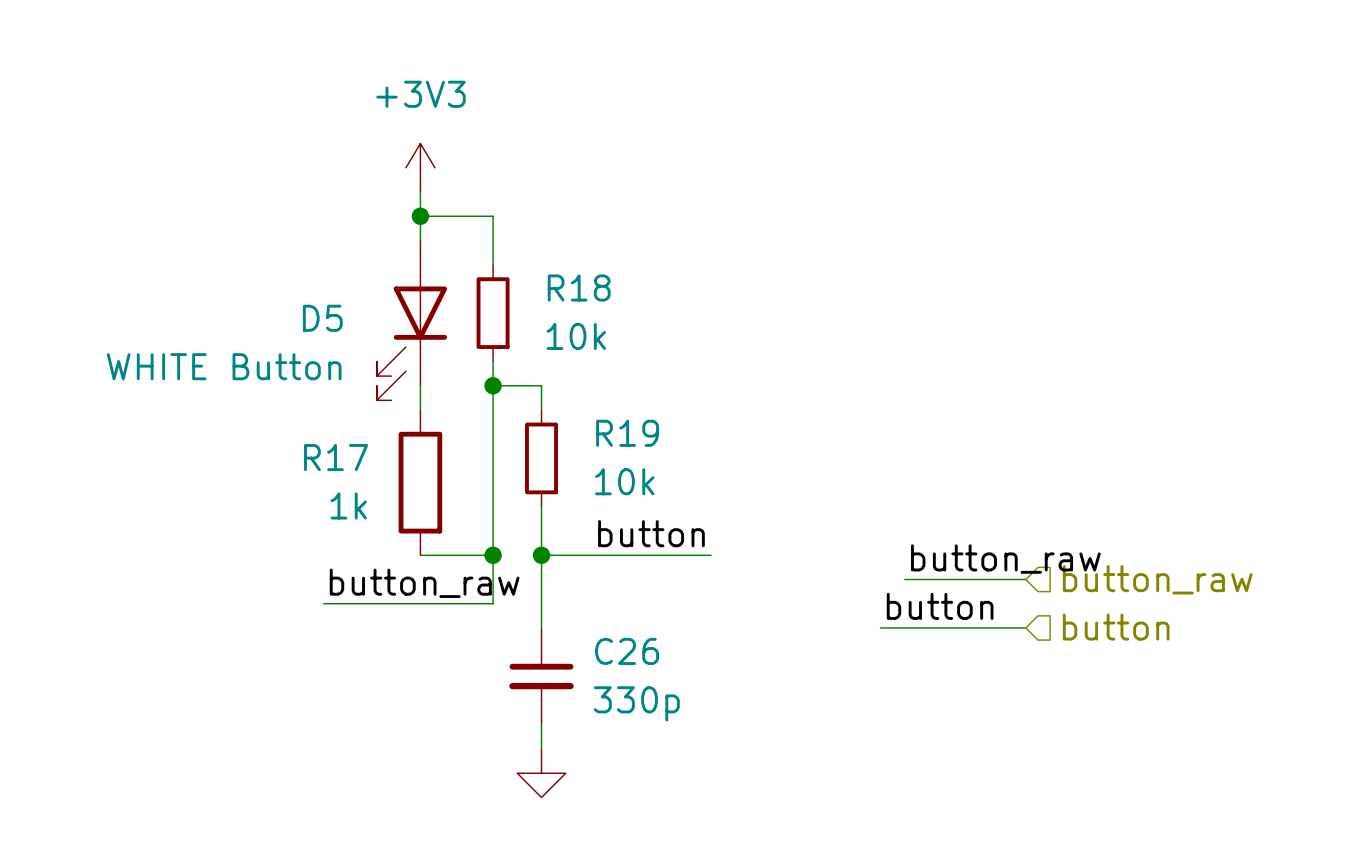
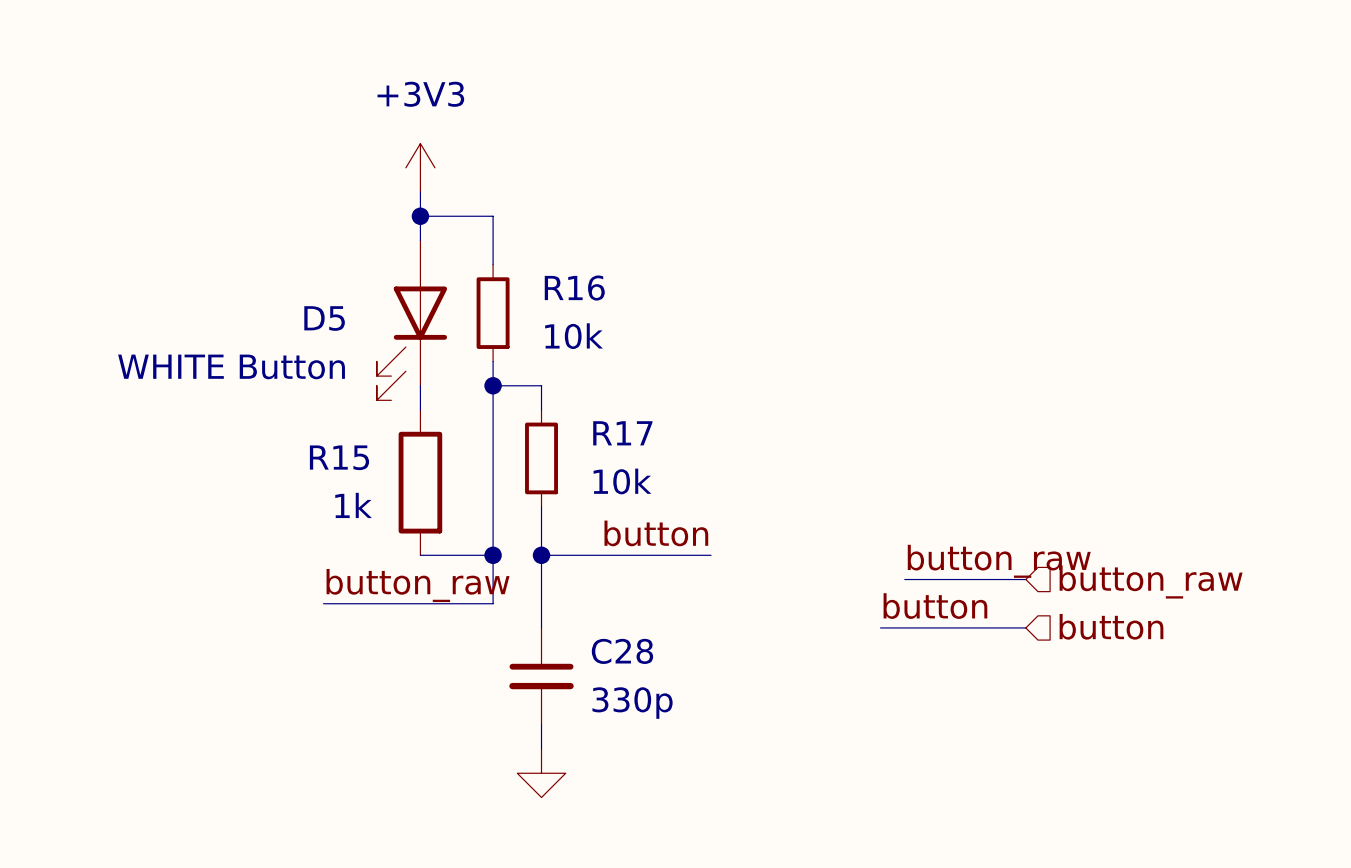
R18 name: R18 (579, 288) -> R16 (574, 288)
R19 name: R19 (627, 433) -> R17 (622, 433)
R17 name: R17 (336, 457) -> R15 (339, 457)
C26 name: C26 (627, 651) -> C28 (622, 651)

